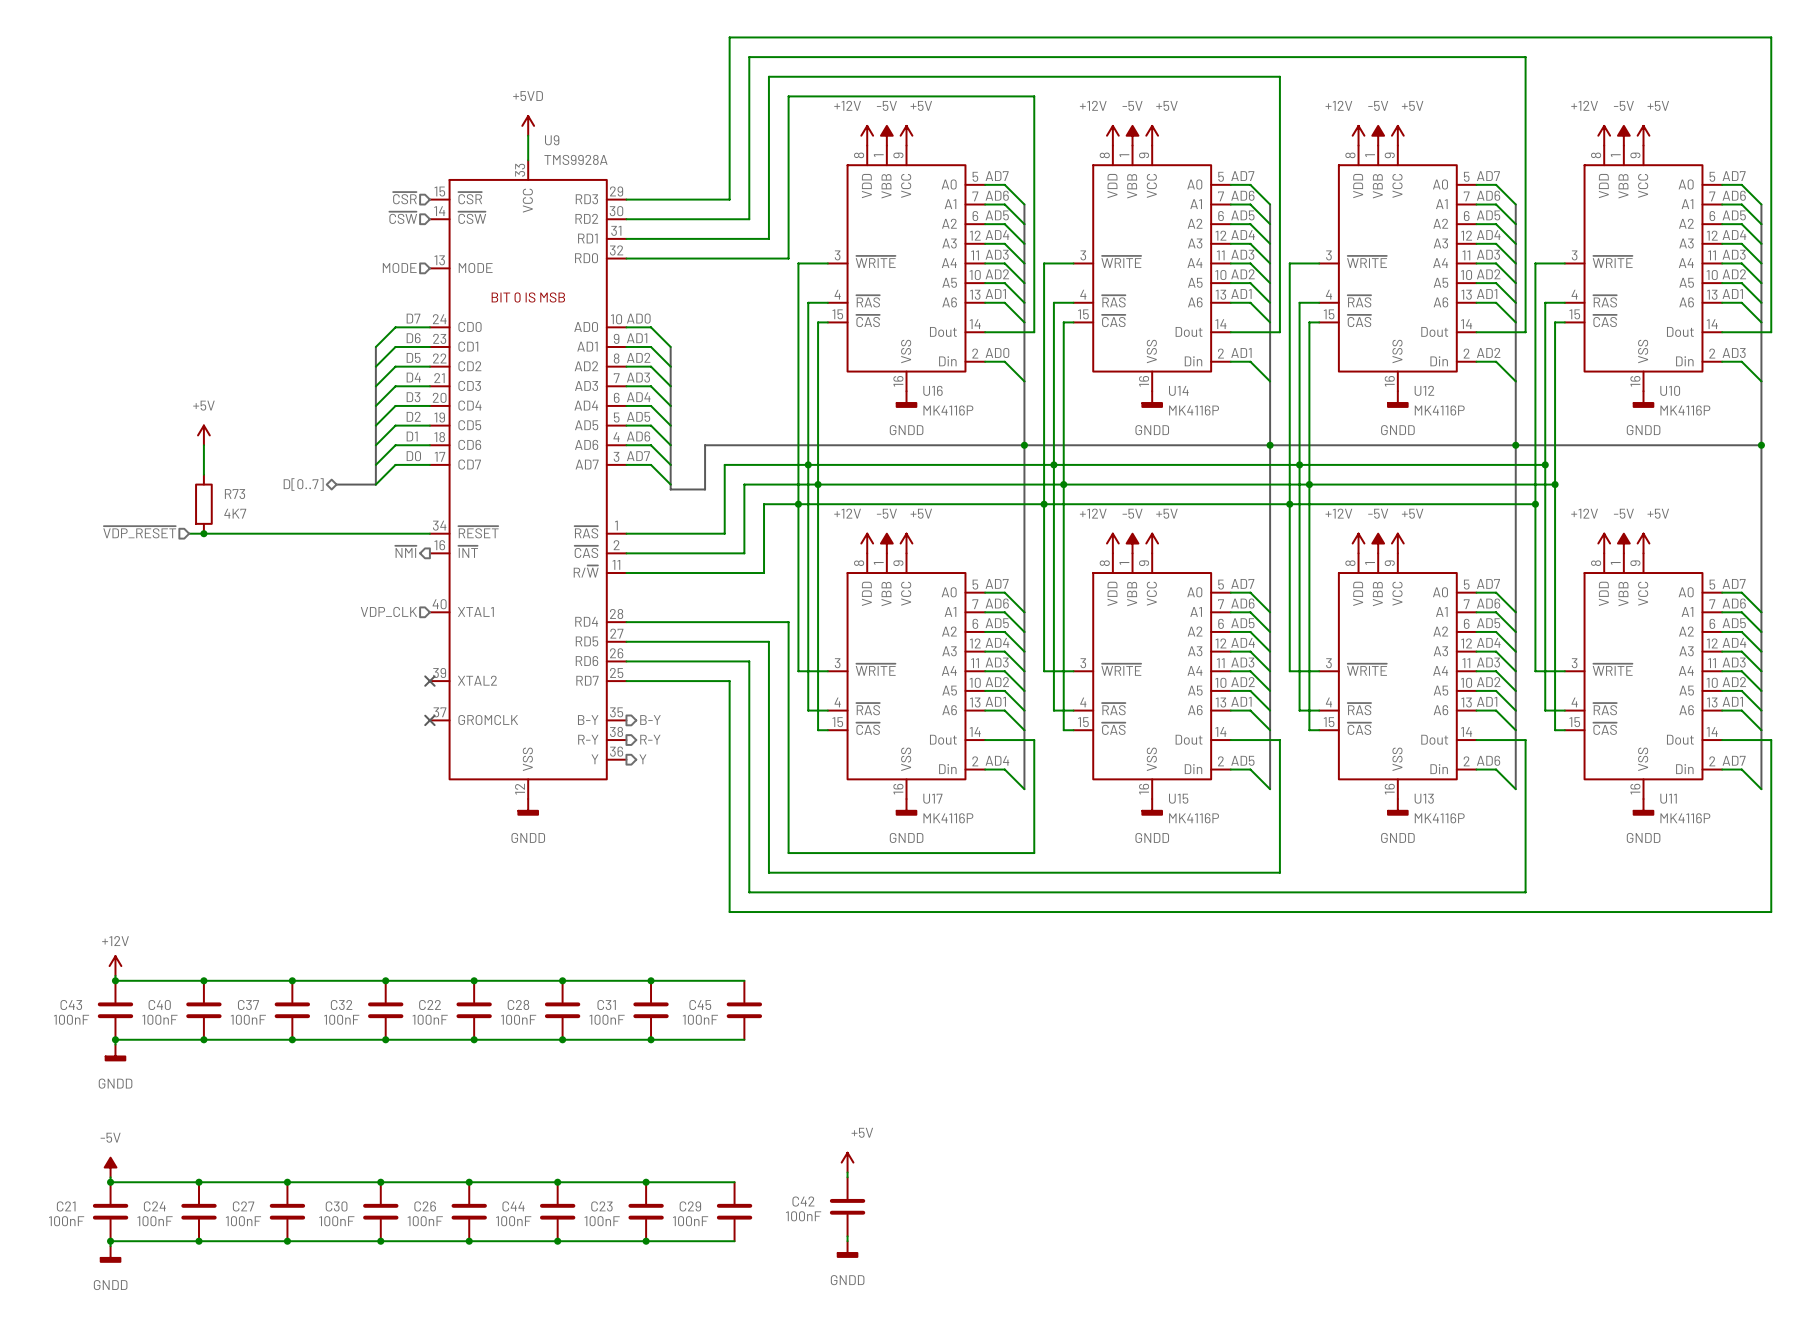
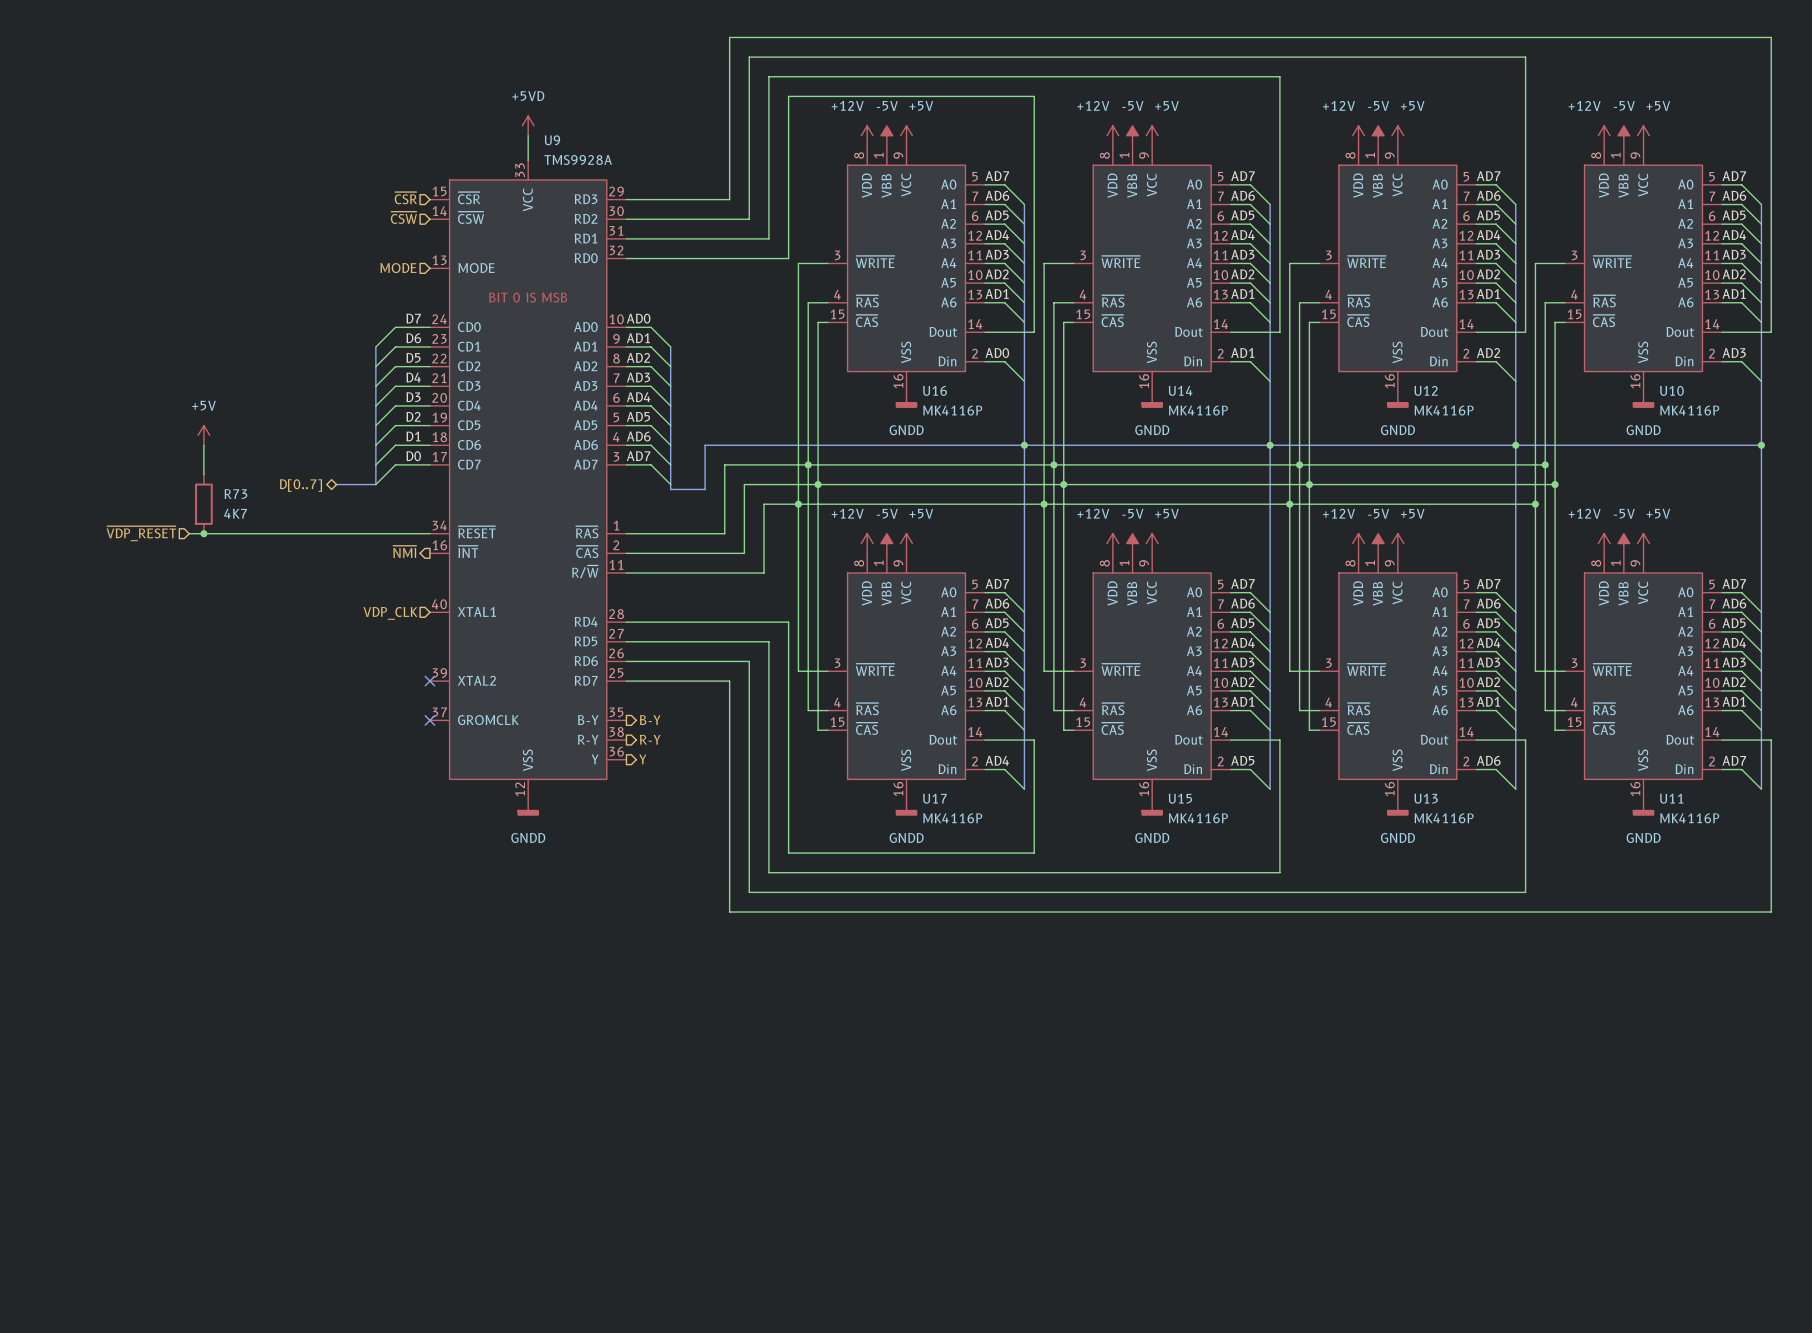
power symbol: +12V (115, 966) -> none
wire: (115, 975) (115, 980) (744, 980) -> none
junction: (115, 980) -> none
junction: (203, 980) -> none
junction: (292, 980) -> none
junction: (385, 980) -> none
junction: (474, 980) -> none
junction: (562, 980) -> none
junction: (651, 980) -> none
C43: 100nF (115, 1010) -> none
C40: 100nF (203, 1010) -> none
C37: 100nF (292, 1010) -> none
C32: 100nF (385, 1010) -> none
C22: 100nF (474, 1010) -> none
C28: 100nF (562, 1010) -> none
C31: 100nF (651, 1010) -> none
C45: 100nF (744, 1010) -> none
junction: (115, 1039) -> none
junction: (203, 1039) -> none
junction: (292, 1039) -> none
junction: (385, 1039) -> none
junction: (474, 1039) -> none
junction: (562, 1039) -> none
junction: (651, 1039) -> none
wire: (744, 1039) (115, 1039) (115, 1044) -> none
power symbol: GNDD (115, 1053) -> none
power symbol: +5V (847, 1162) -> none
power symbol: -5V (110, 1167) -> none
wire: (847, 1172) (847, 1177) -> none
wire: (110, 1177) (110, 1182) (734, 1182) -> none
junction: (110, 1182) -> none
junction: (199, 1182) -> none
junction: (287, 1182) -> none
junction: (380, 1182) -> none
junction: (469, 1182) -> none
junction: (557, 1182) -> none
junction: (646, 1182) -> none
C42: 100nF (847, 1206) -> none
C21: 100nF (110, 1211) -> none
C24: 100nF (199, 1211) -> none
C27: 100nF (287, 1211) -> none
C30: 100nF (380, 1211) -> none
C26: 100nF (469, 1211) -> none
C44: 100nF (557, 1211) -> none
C23: 100nF (646, 1211) -> none
C29: 100nF (734, 1211) -> none
wire: (847, 1236) (847, 1241) -> none
junction: (110, 1241) -> none
junction: (199, 1241) -> none
junction: (287, 1241) -> none
junction: (380, 1241) -> none
junction: (469, 1241) -> none
junction: (557, 1241) -> none
junction: (646, 1241) -> none
wire: (734, 1241) (110, 1241) (110, 1246) -> none
power symbol: GNDD (847, 1249) -> none
power symbol: GNDD (110, 1254) -> none

